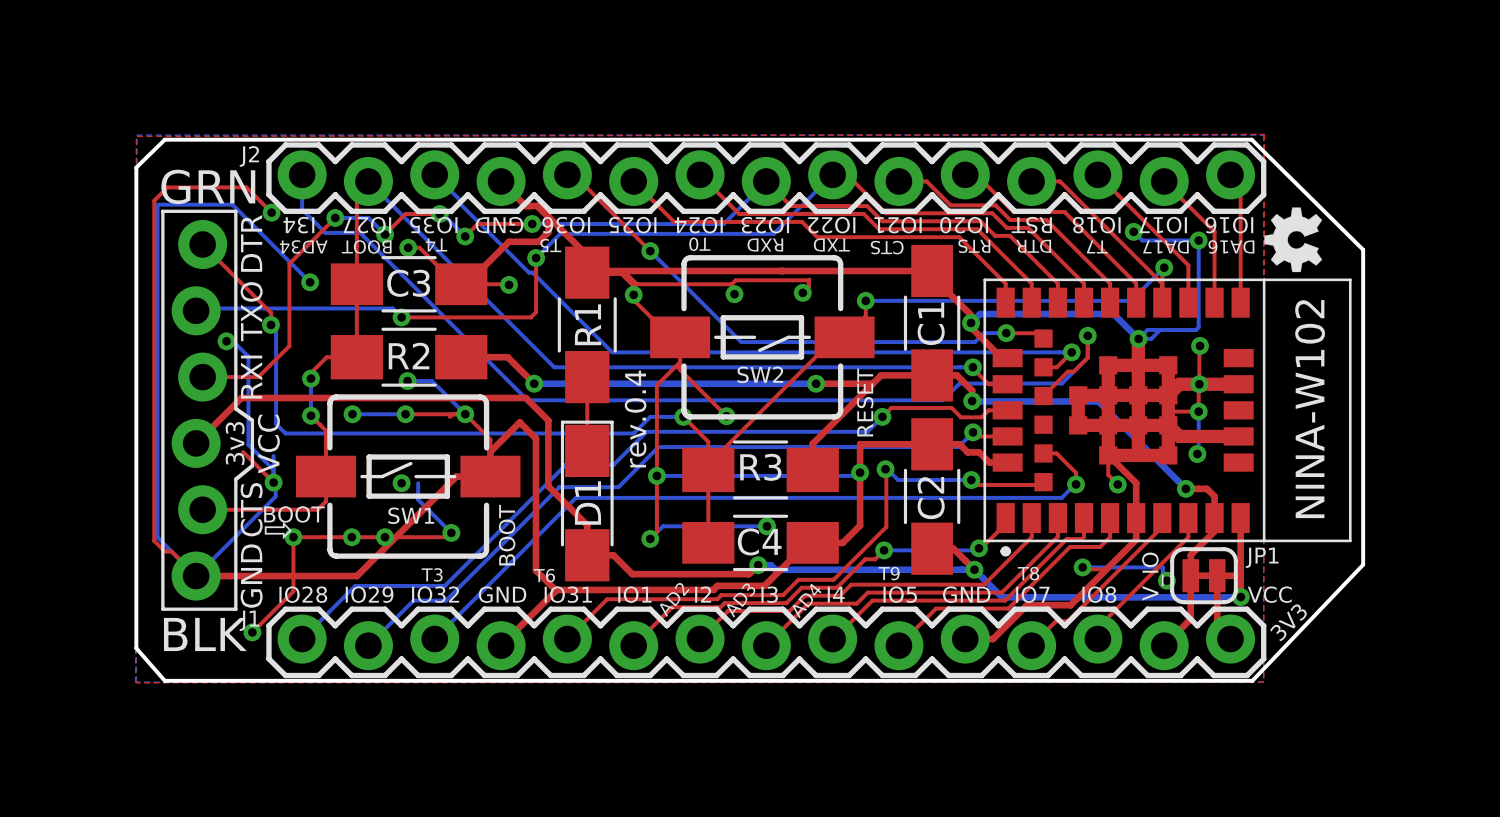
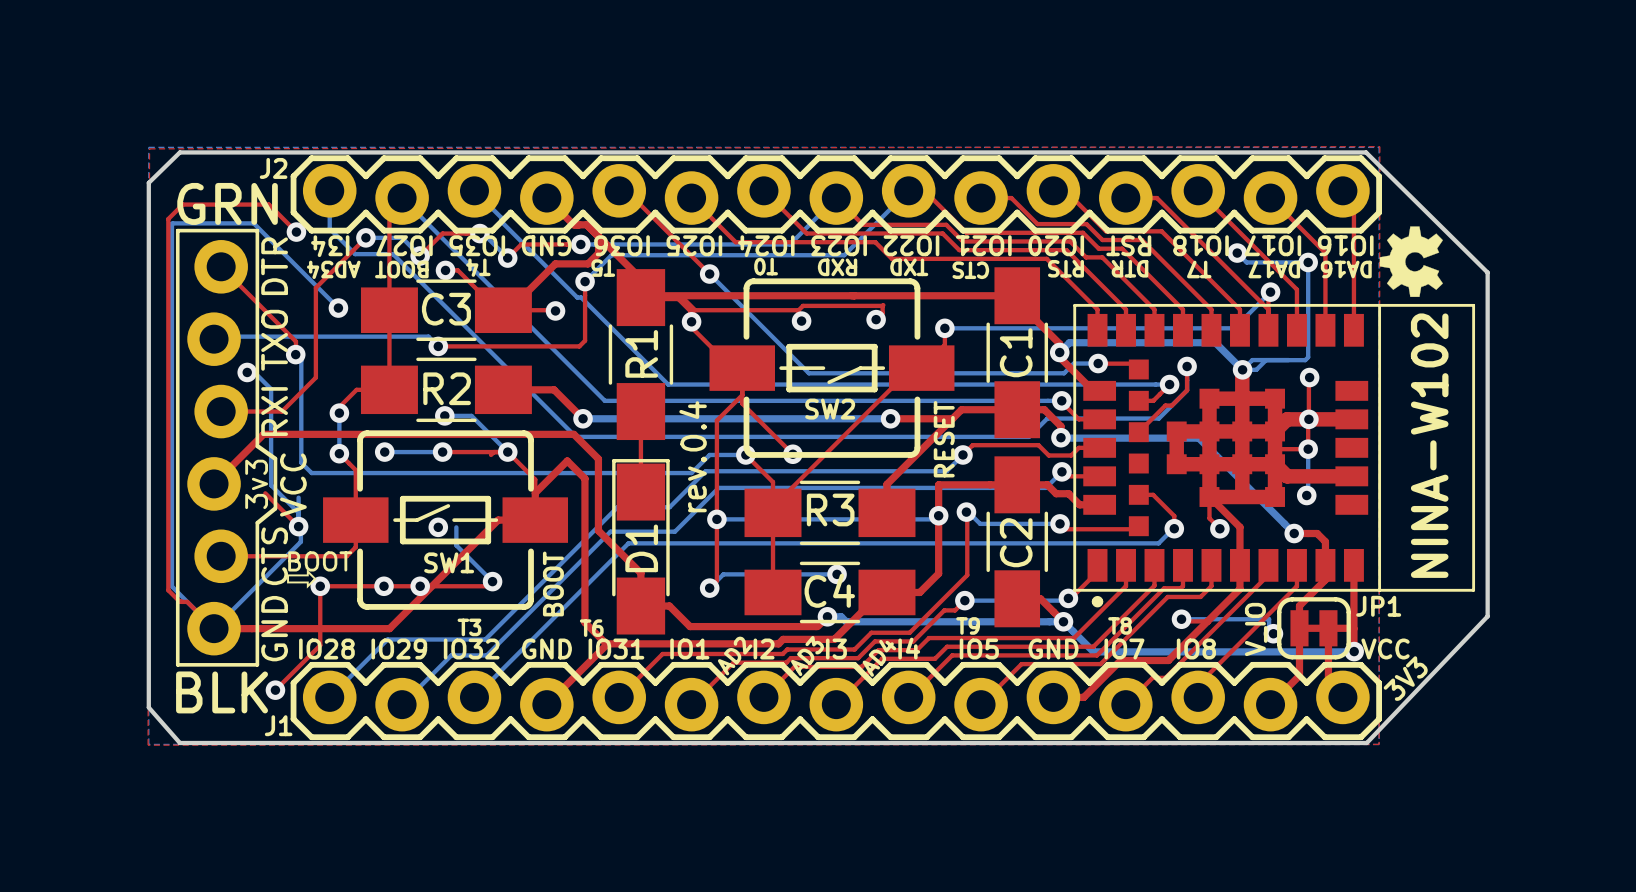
J1 name position: J1 (249, 620) -> J1 (278, 725)

